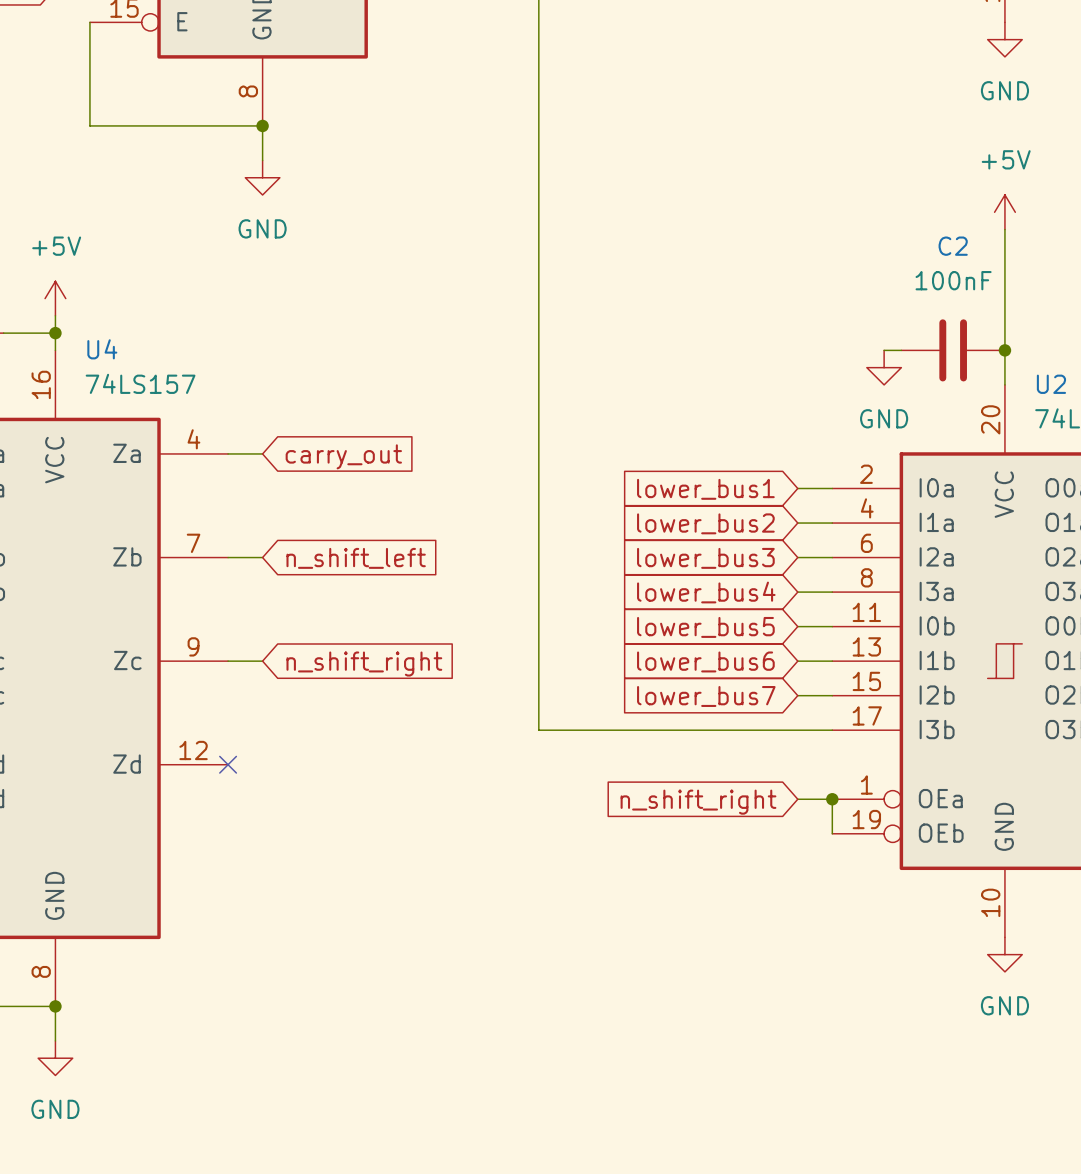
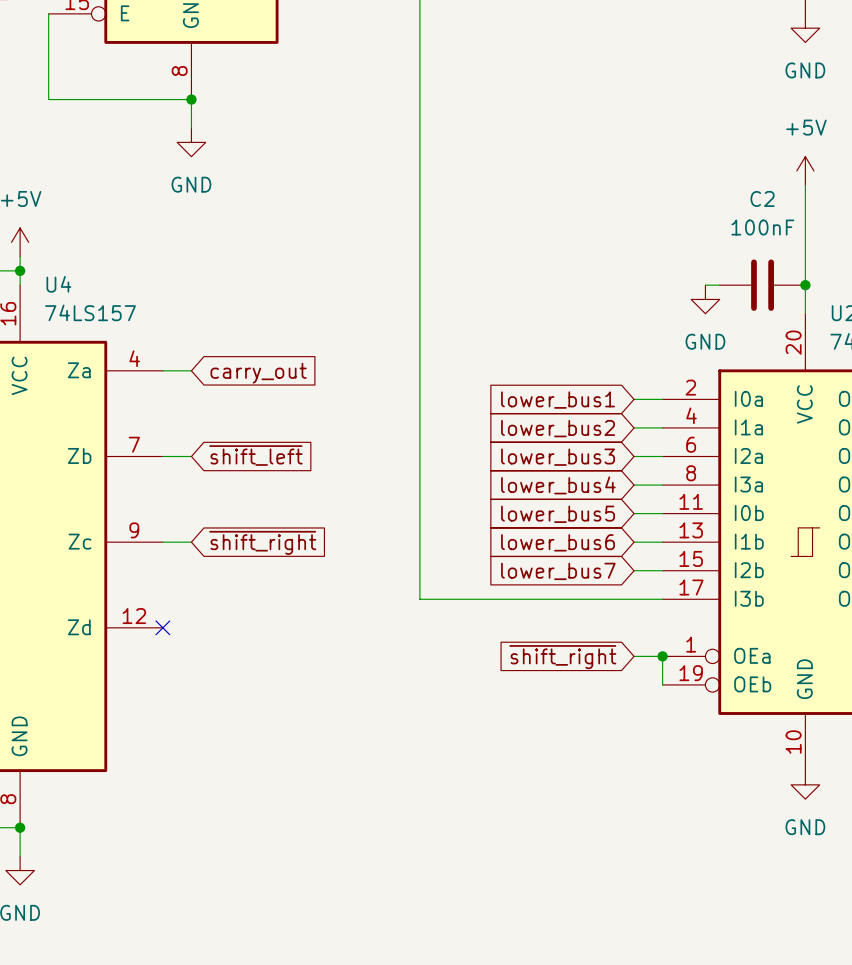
global label: n_shift_left (356, 558) -> ~{shift_left} (255, 455)
global label: n_shift_right (364, 664) -> ~{shift_right} (262, 542)
global label: n_shift_right (698, 802) -> ~{shift_right} (562, 657)

